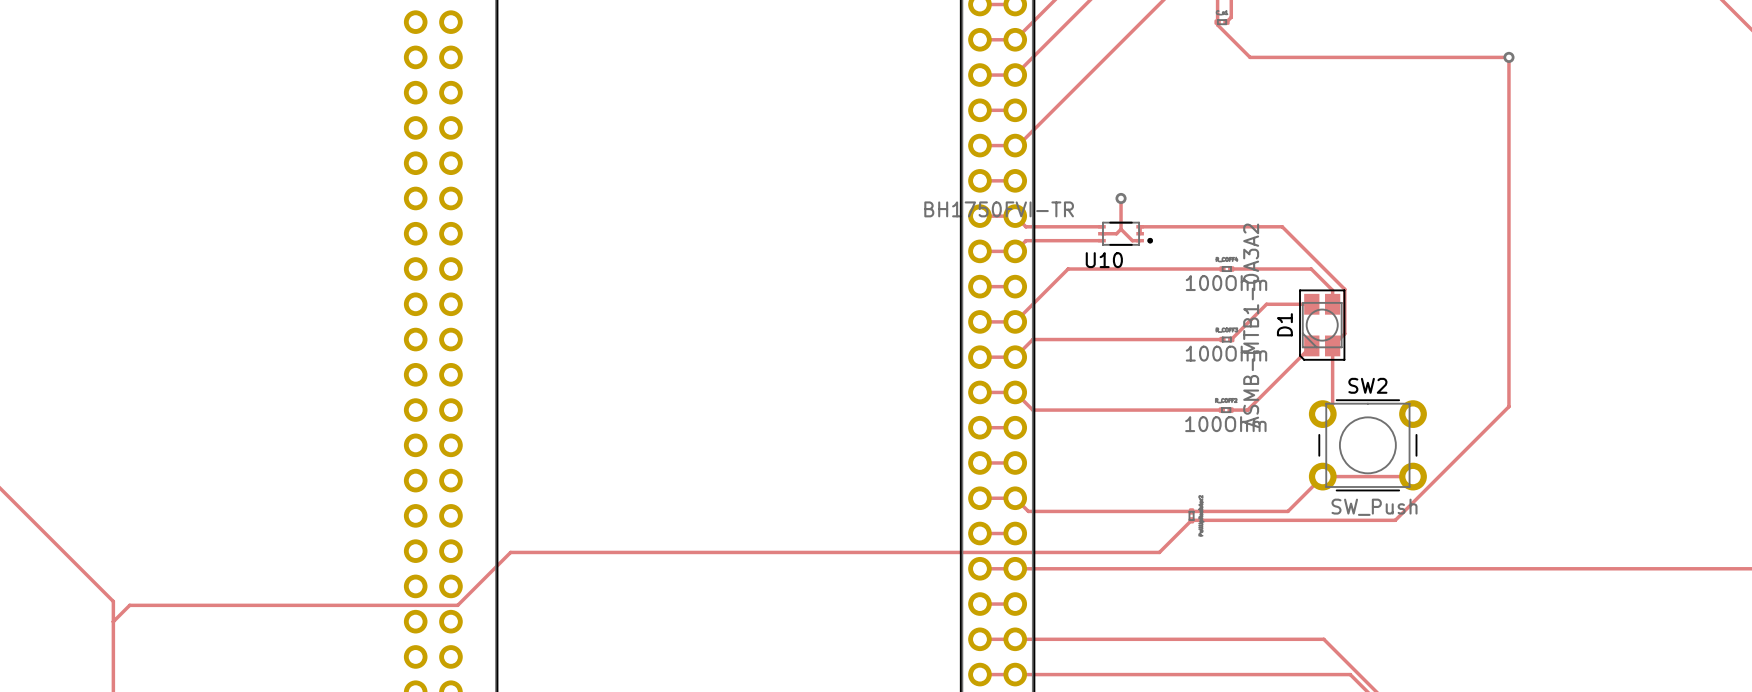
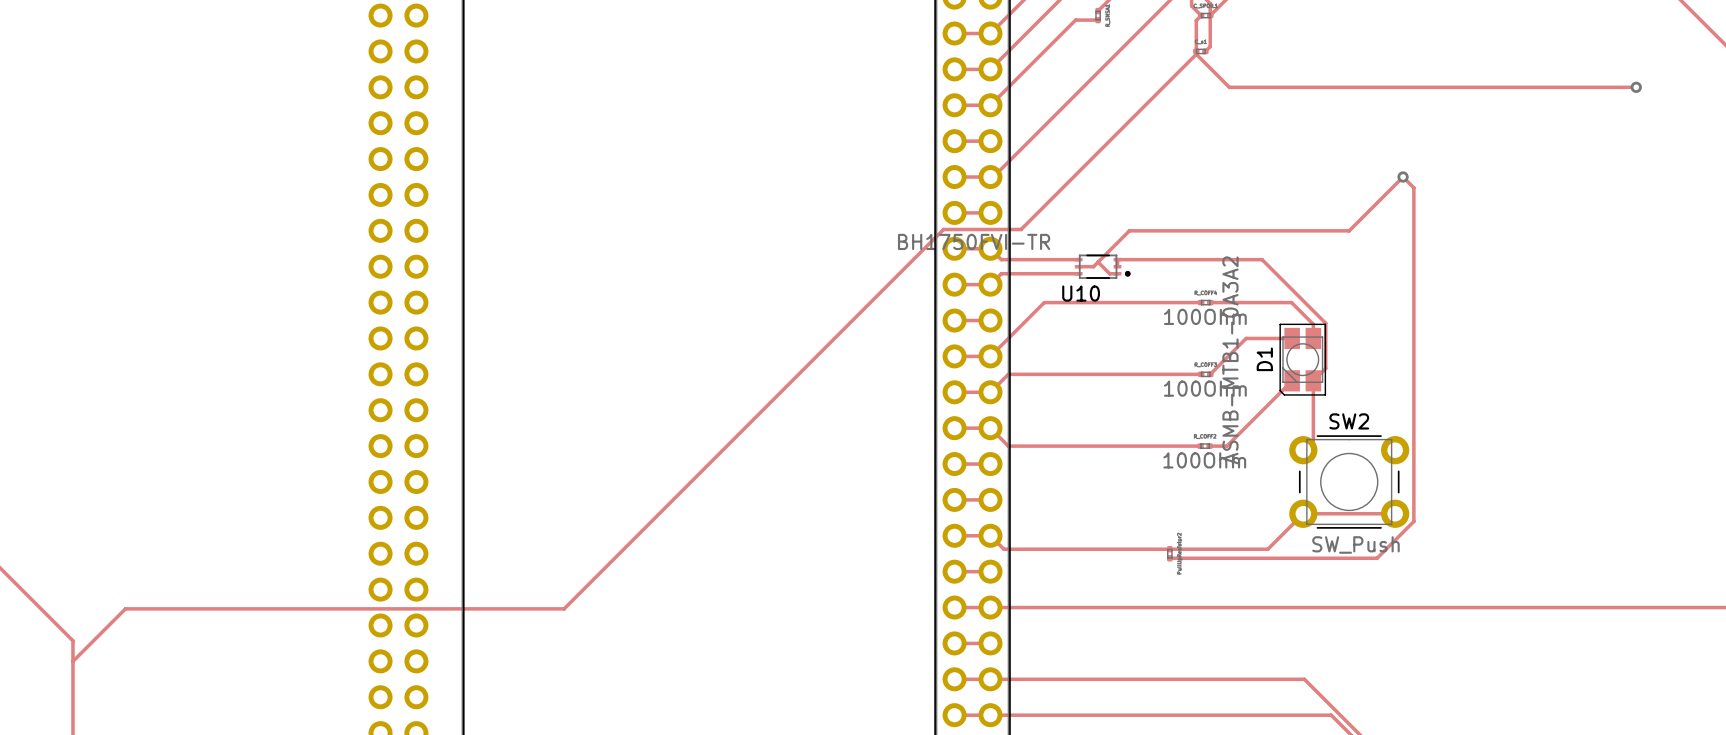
track: (1508, 57) (1508, 406) (1431, 484) -> (1492, 87) (1636, 87)
via: (1508, 57) -> none
via: none -> (1636, 87)
via: none -> (1403, 177)
track: (1121, 198) (1121, 229) -> (1413, 521) (1413, 187) (1403, 177) (1349, 230) (1129, 230) (1098, 262)
via: (1121, 198) -> none
track: (1191, 520) (1159, 552) (510, 552) (457, 605) (129, 605) -> (1196, 54) (1021, 229) (943, 229) (564, 608) (125, 608) (89, 644)

